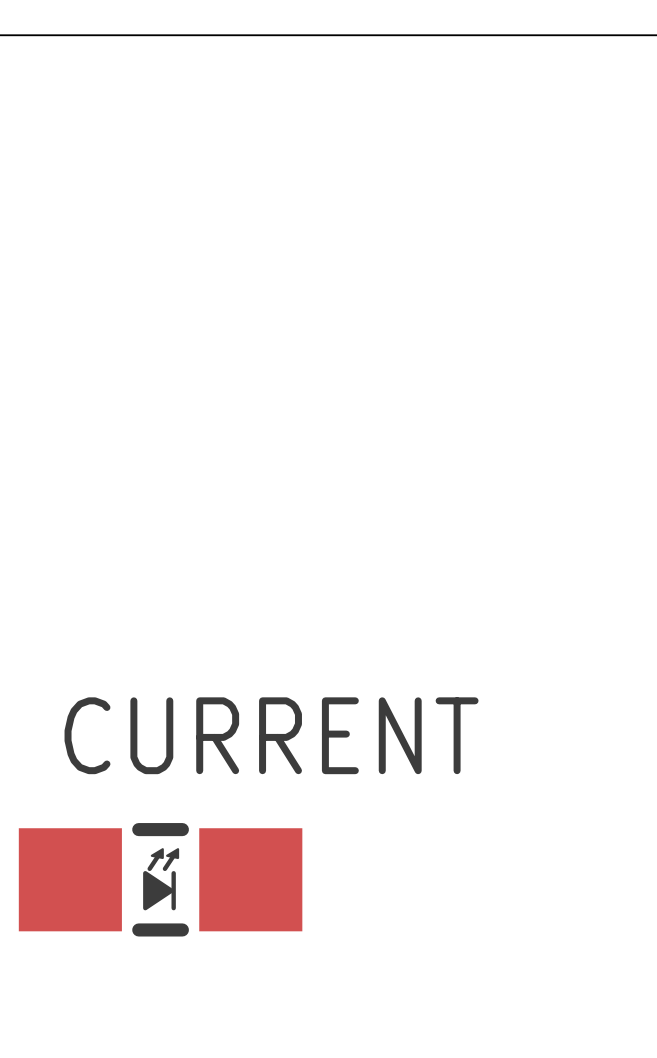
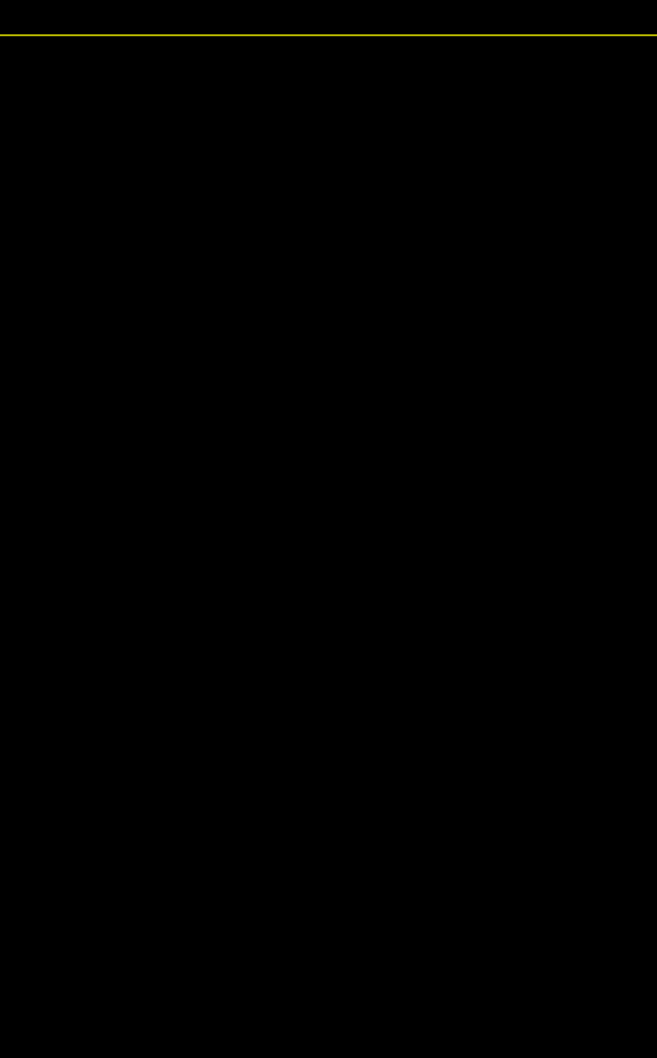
CURRENT: (160, 879) -> none

